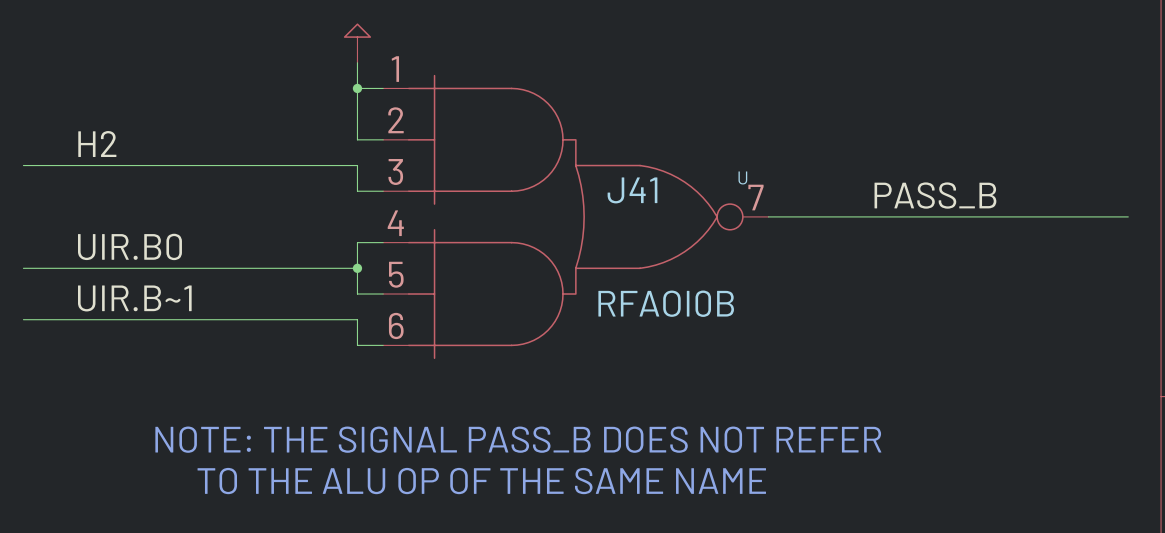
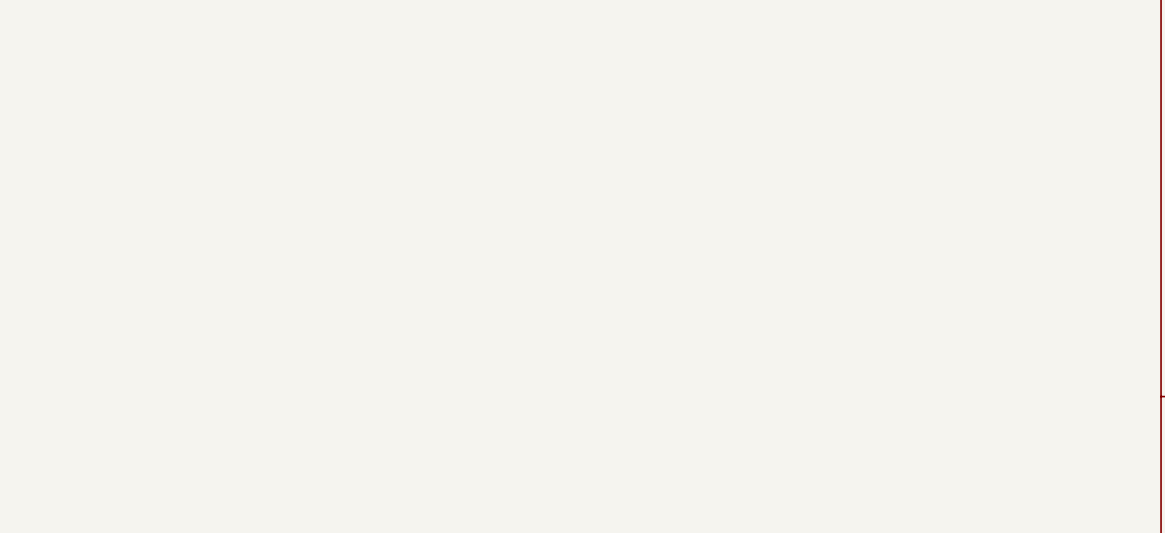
power symbol: (357, 43) -> none
wire: (357, 62) (357, 139) (383, 139) -> none
wire: (357, 88) (383, 88) -> none
junction: (357, 88) -> none
label: H2 (97, 144) -> none
wire: (23, 165) (357, 165) (357, 191) (383, 191) -> none
label: PASS_B (935, 195) -> none
U: (575, 216) -> none
wire: (768, 216) (1128, 216) -> none
wire: (383, 242) (357, 242) (357, 294) (383, 294) -> none
label: UIR.B0 (129, 246) -> none
wire: (23, 268) (357, 268) -> none
junction: (357, 268) -> none
label: UIR.B~1 (134, 298) -> none
wire: (23, 319) (357, 319) (357, 345) (383, 345) -> none
text: NOTE: THE SIGNAL PASS_B DOES NOT REFER (518, 439) -> none
text: TO THE ALU OP OF THE SAME NAME (481, 481) -> none

